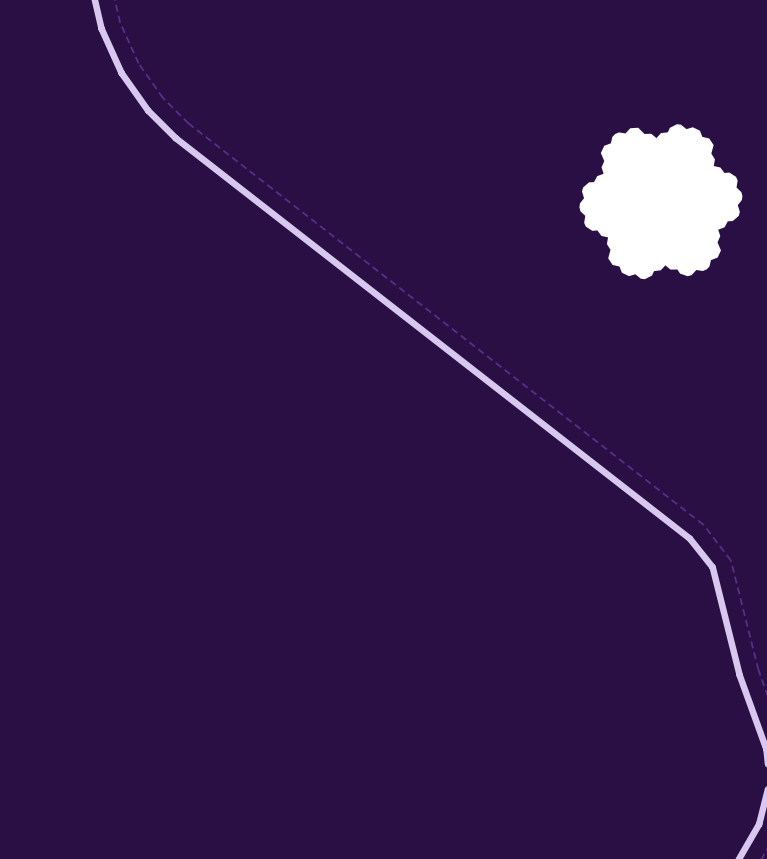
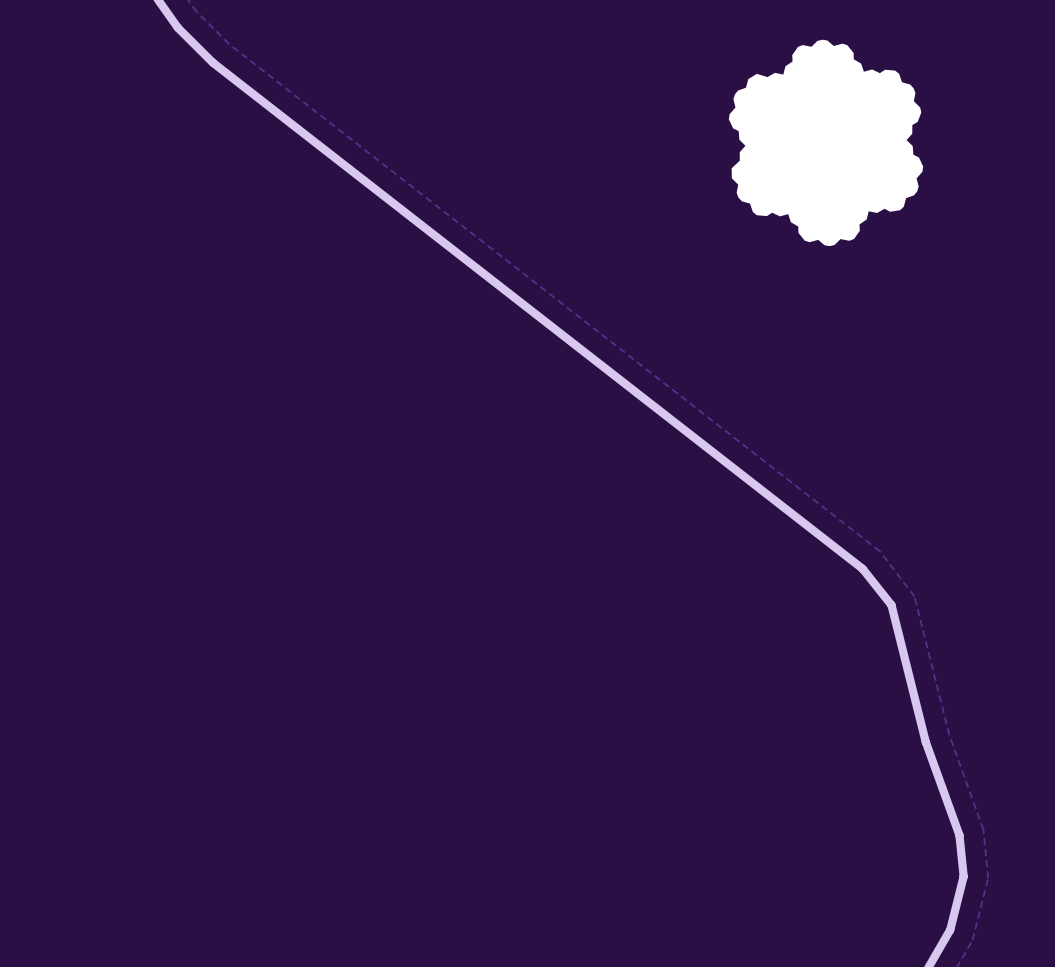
drawing shape: [579, 124, 743, 280] -> [728, 39, 924, 247]

